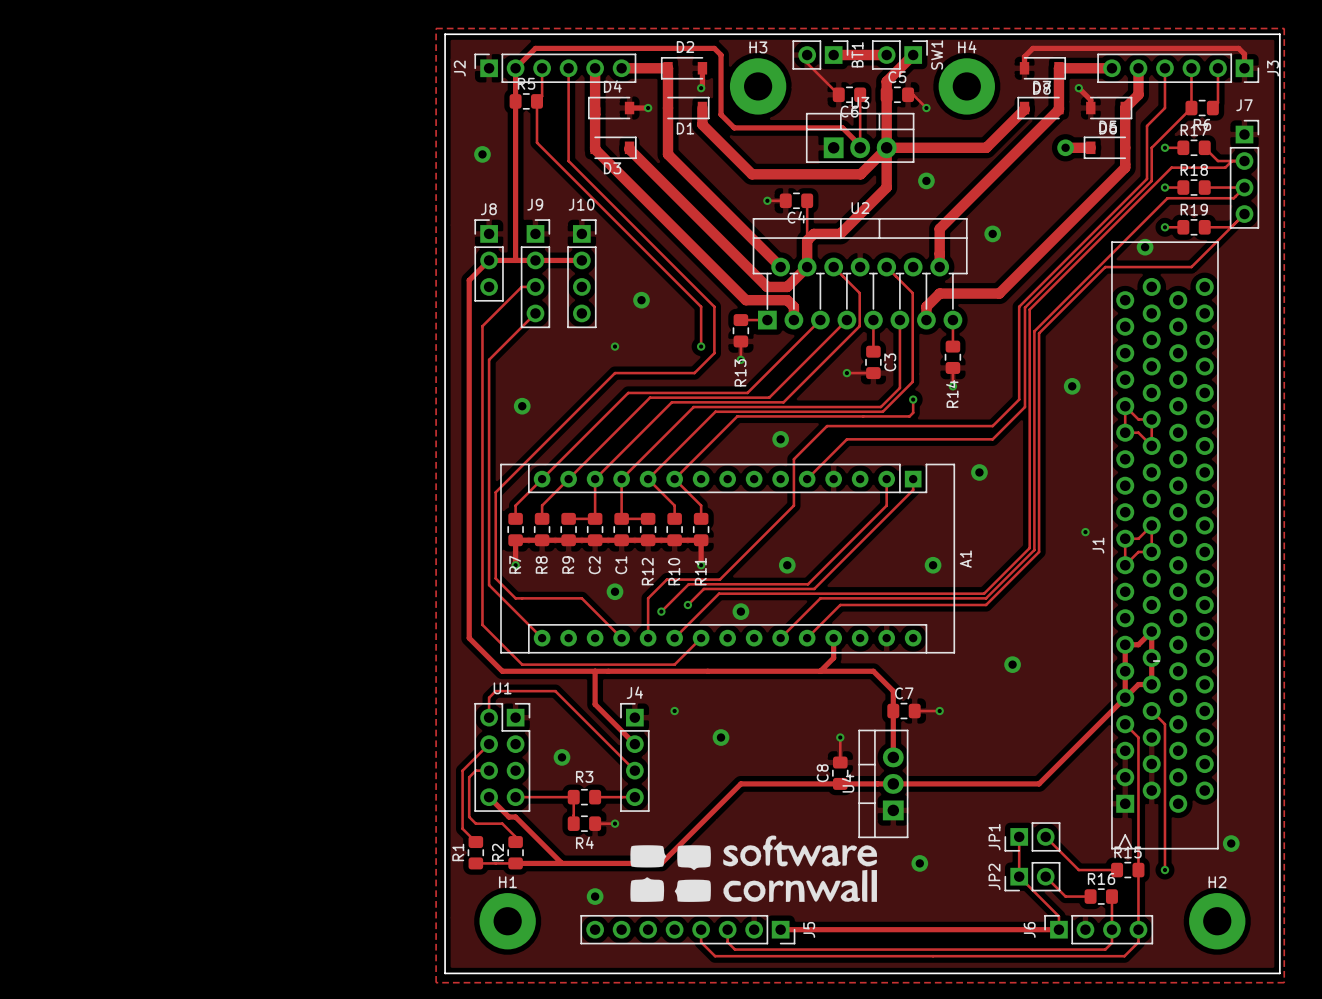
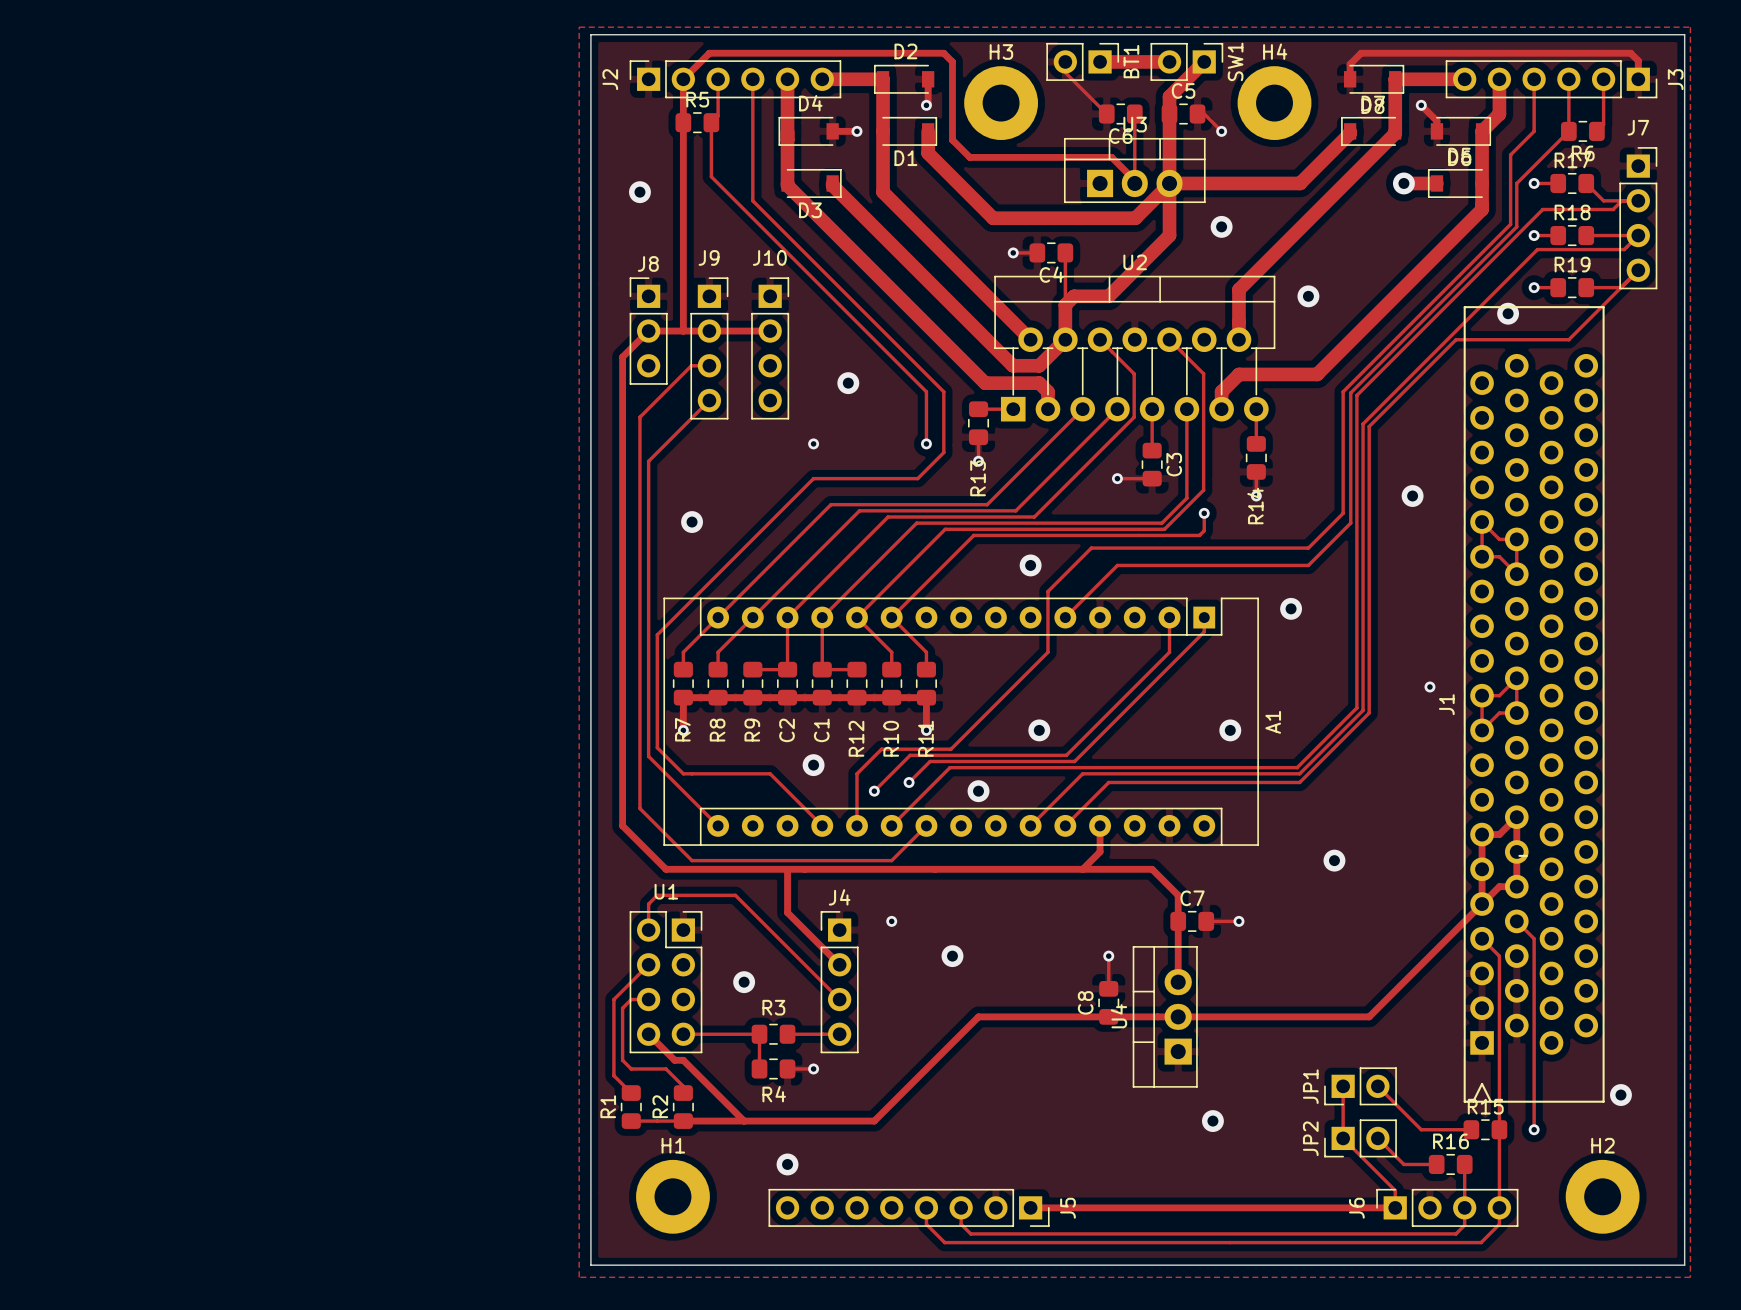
drawing: [630, 835, 878, 902] -> none

